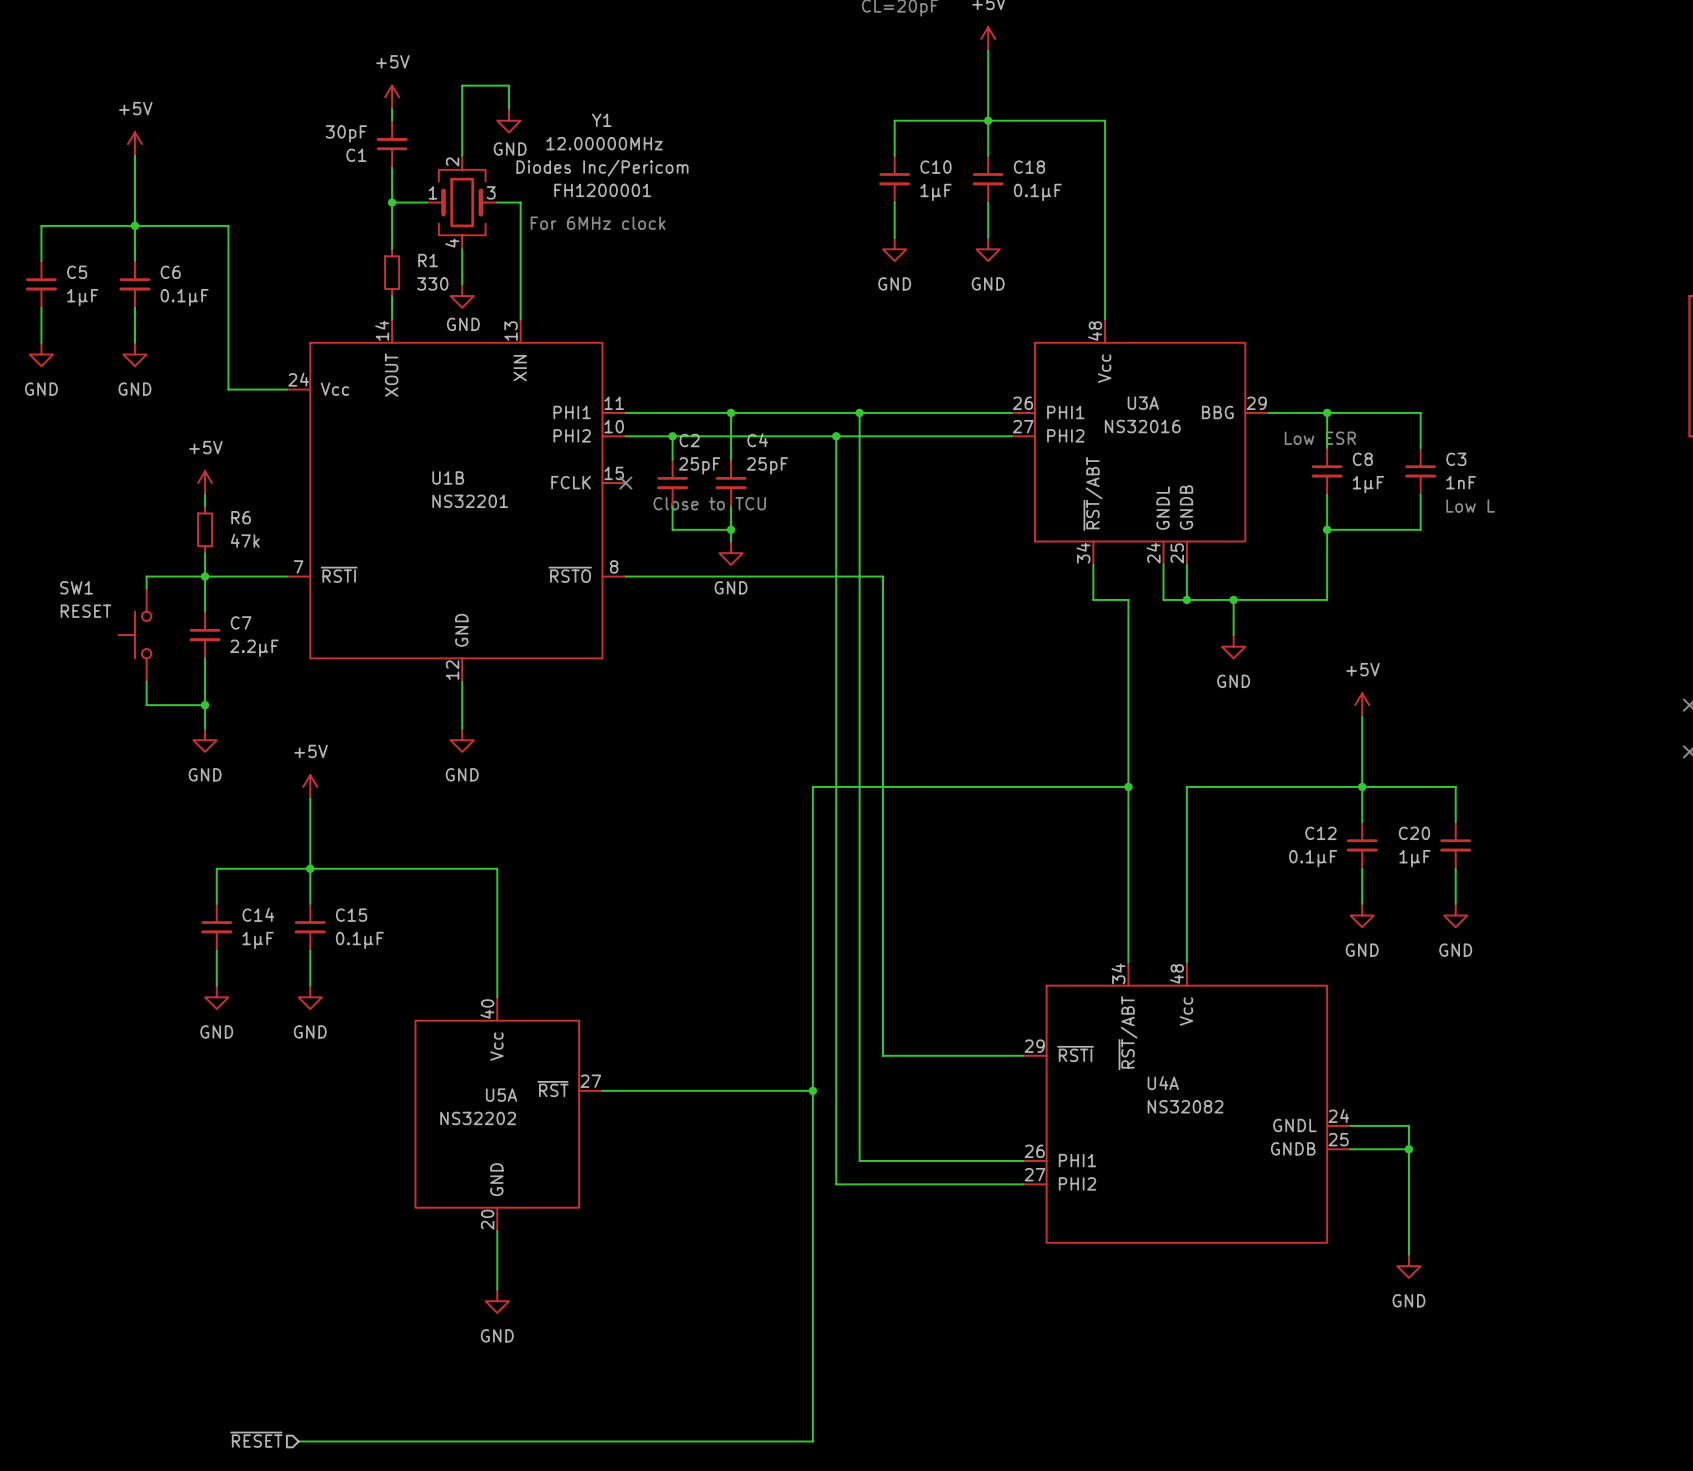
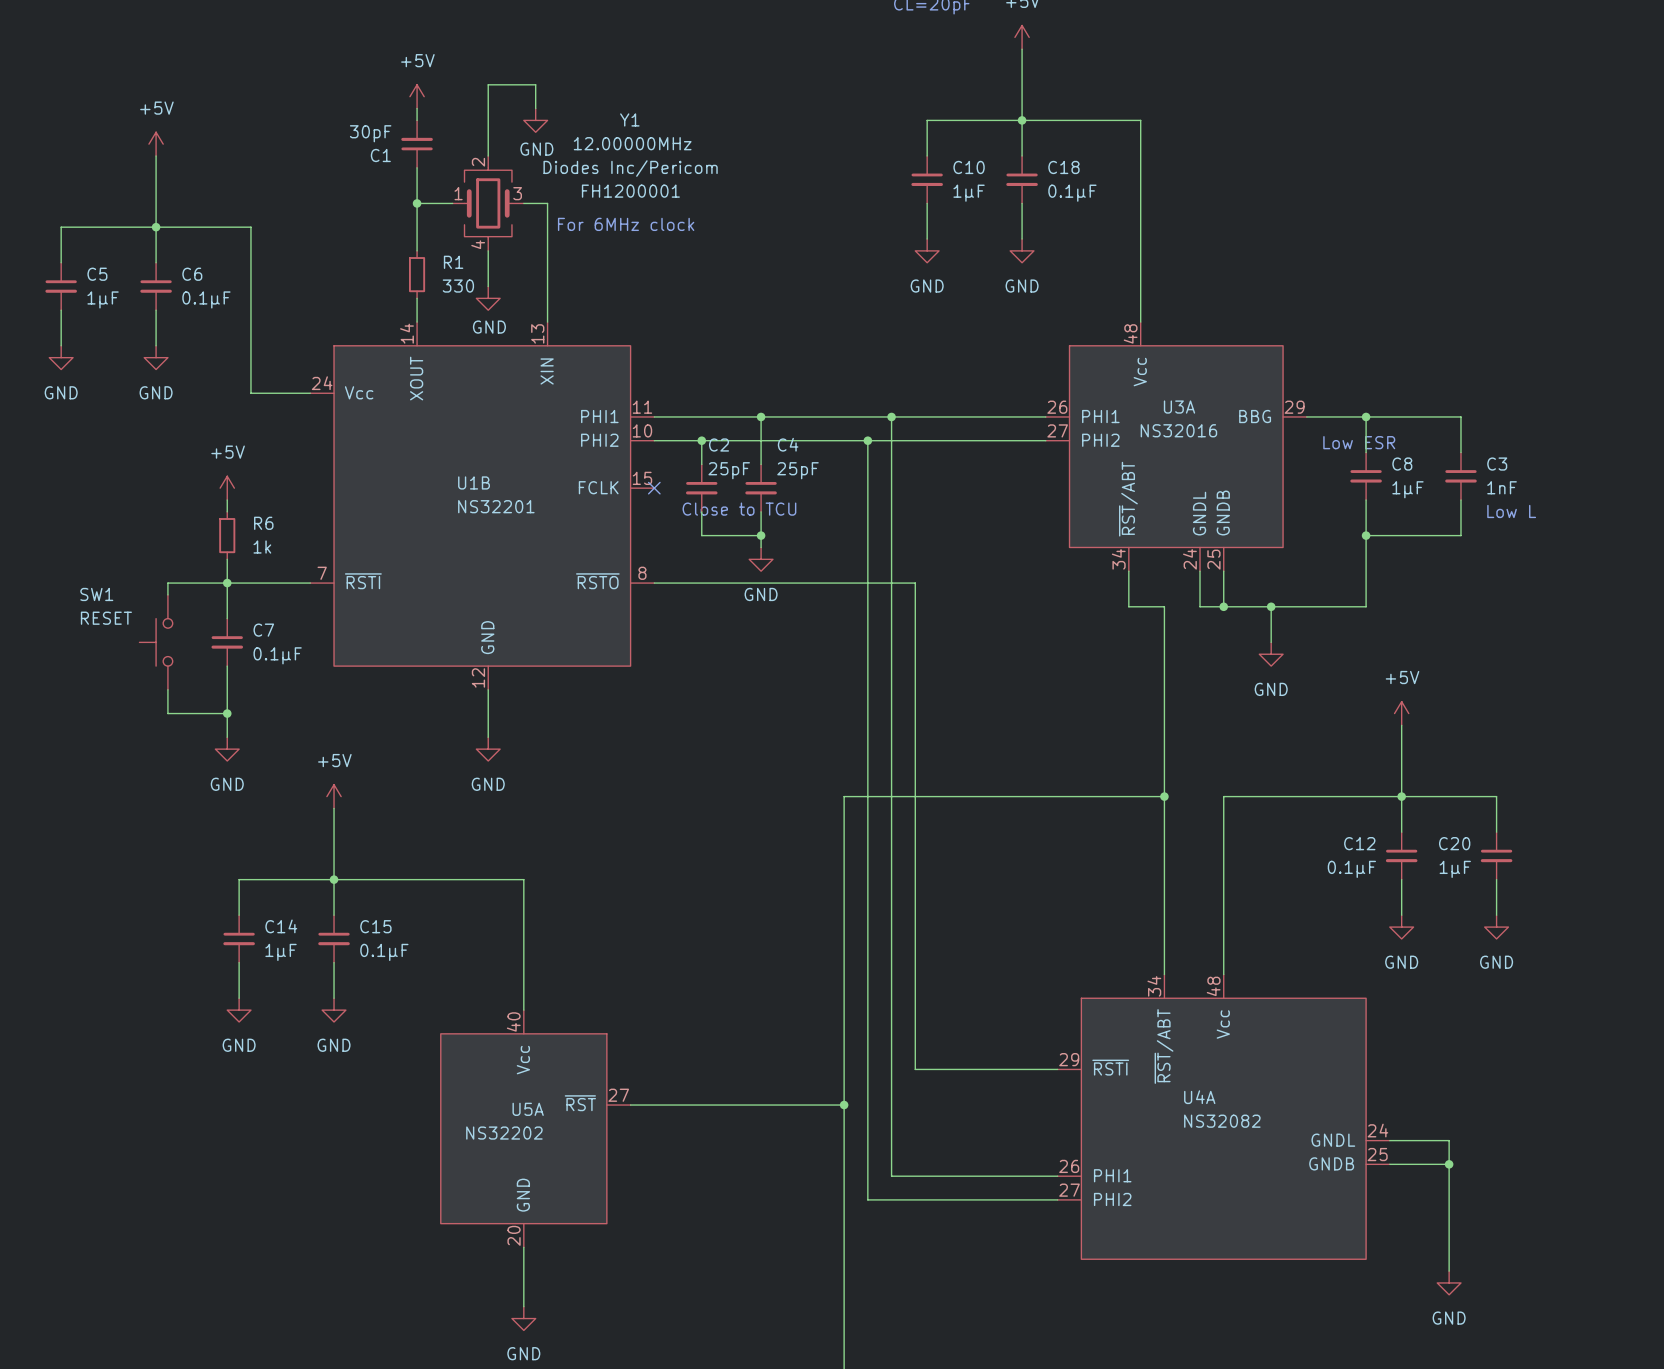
R6 value: 47k (245, 540) -> 1k (262, 547)
C7 value: 2.2µF (254, 648) -> 0.1µF (277, 655)

